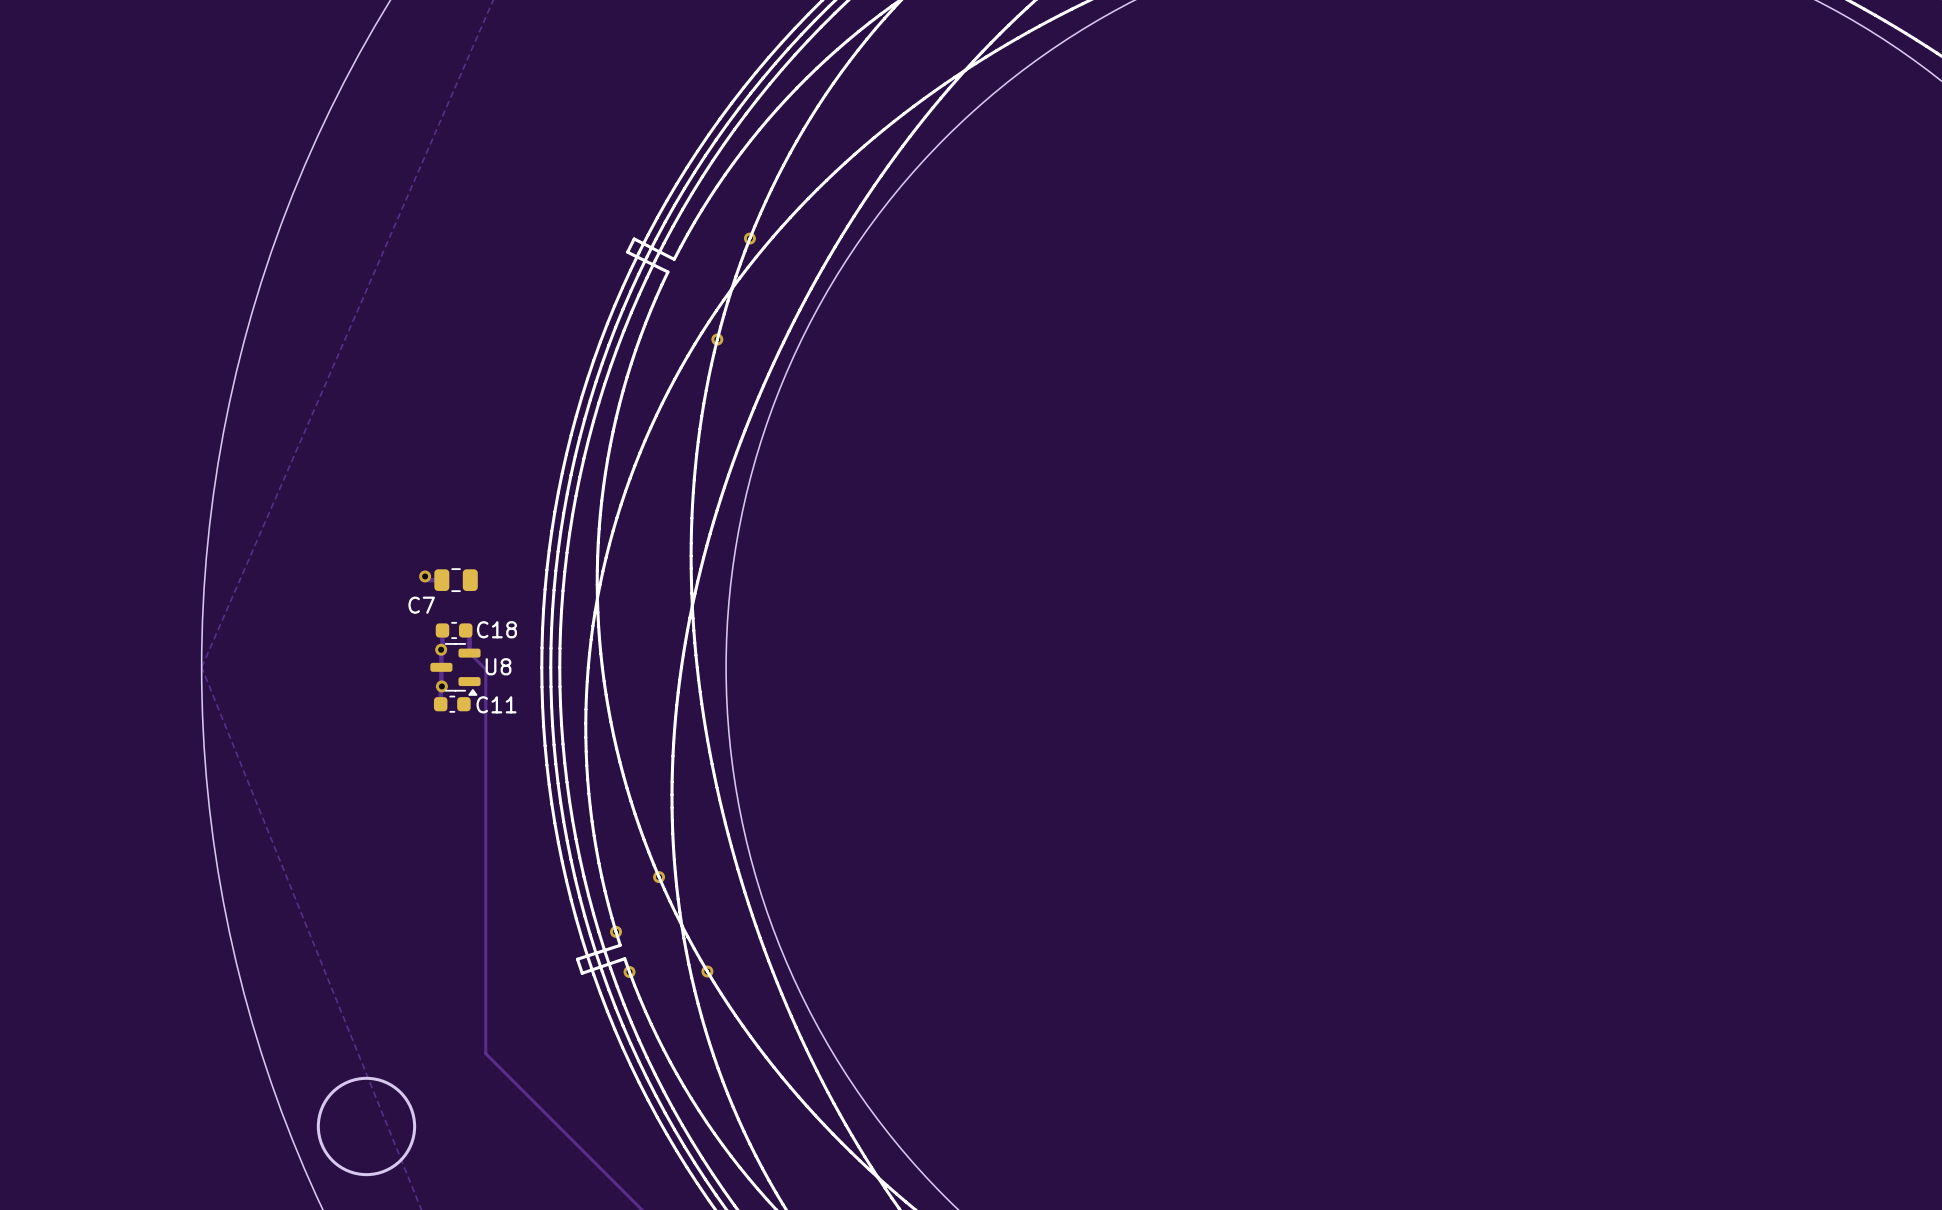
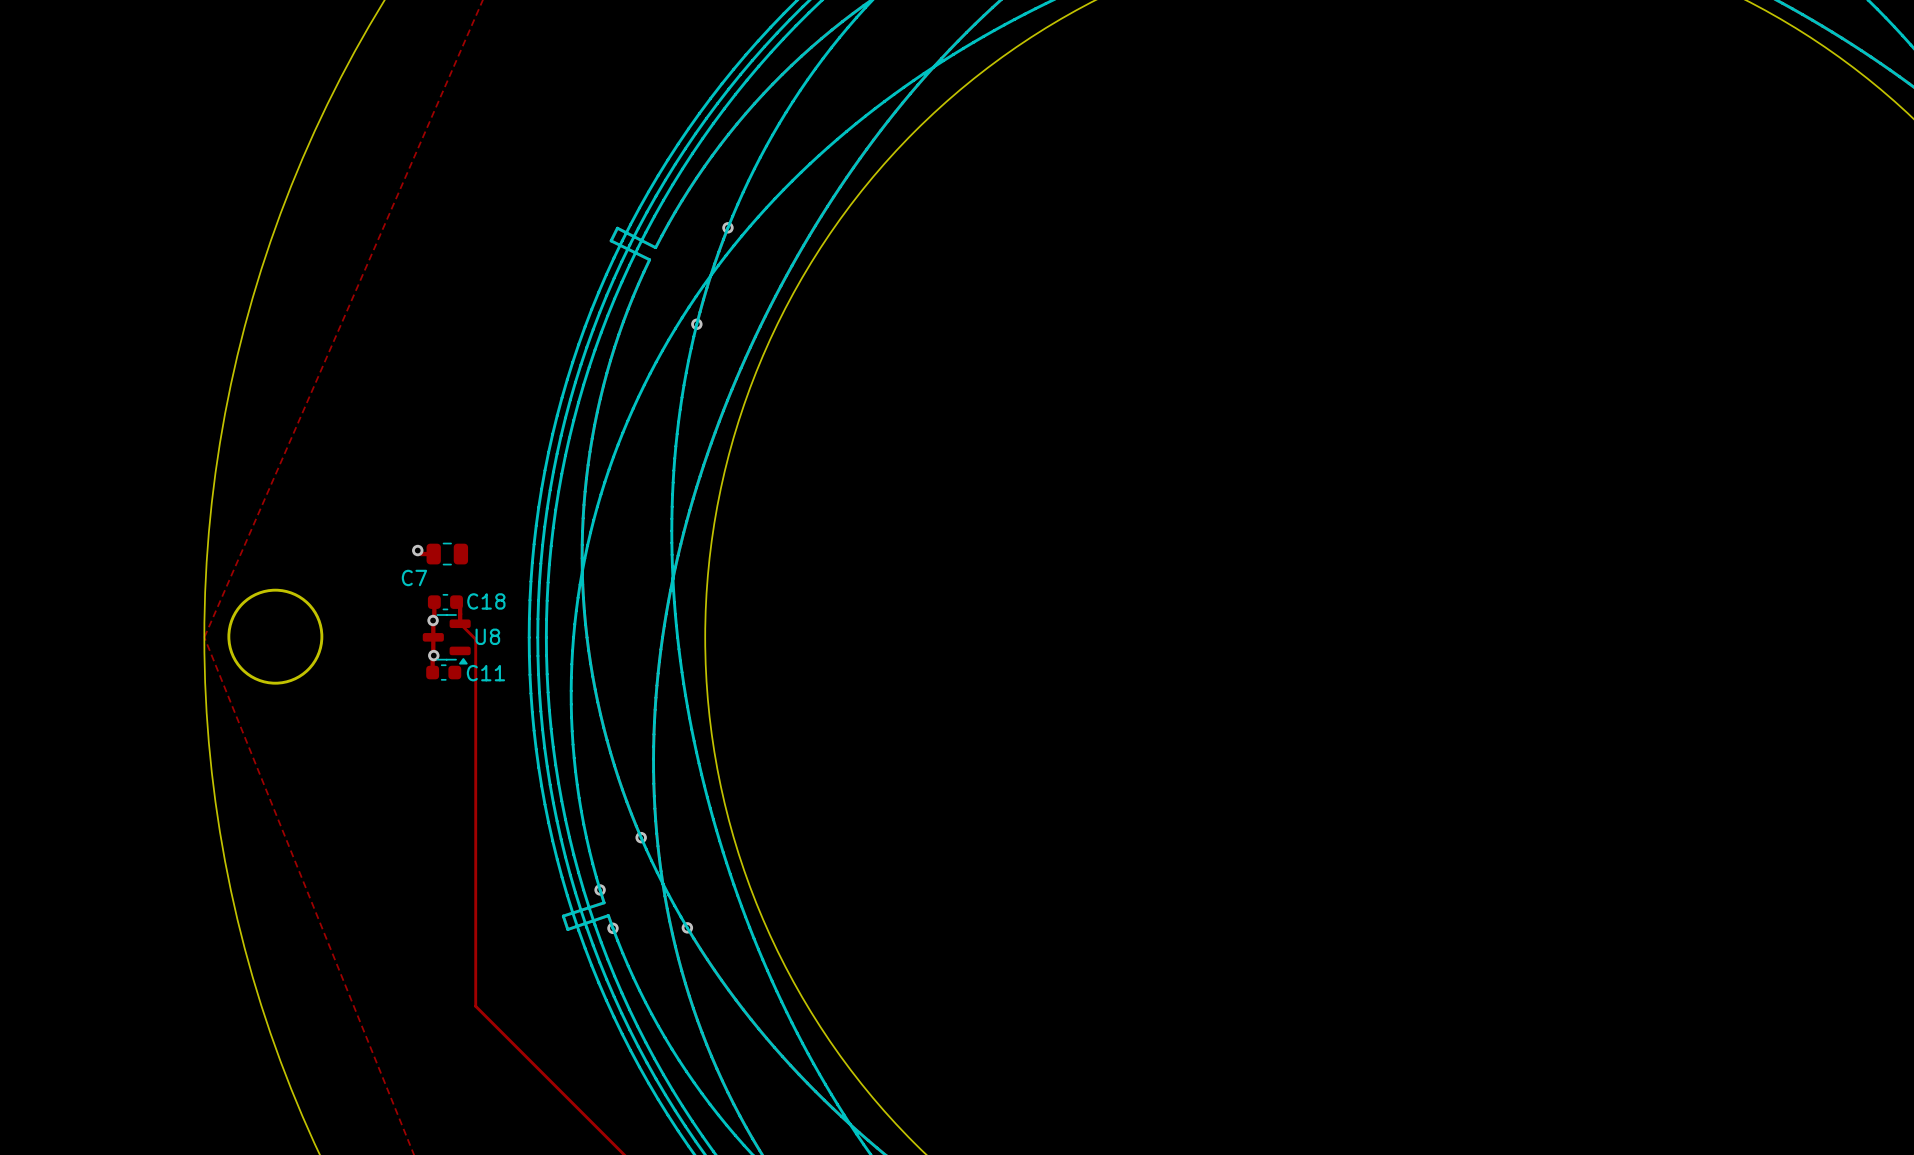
round board edge: none -> [227, 588, 324, 685]
round board edge: [316, 1076, 417, 1177] -> none

